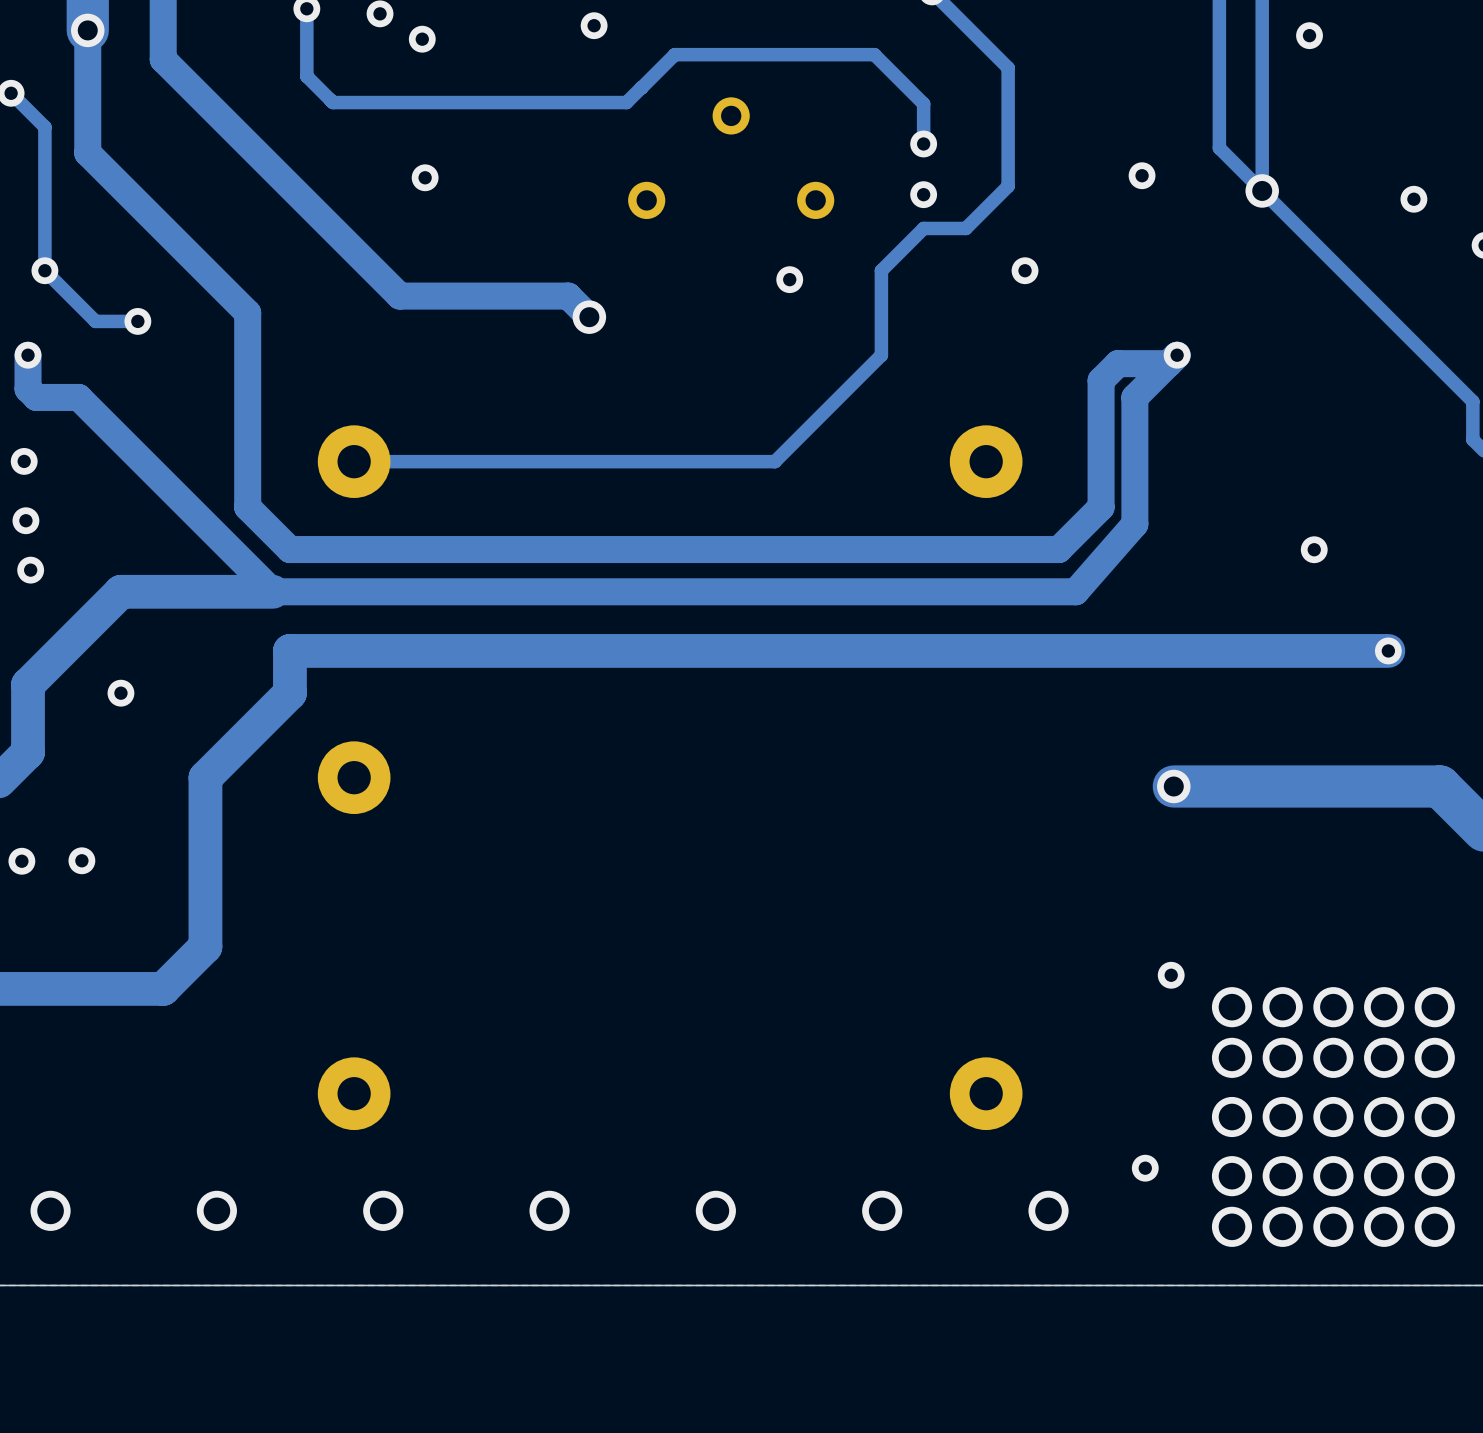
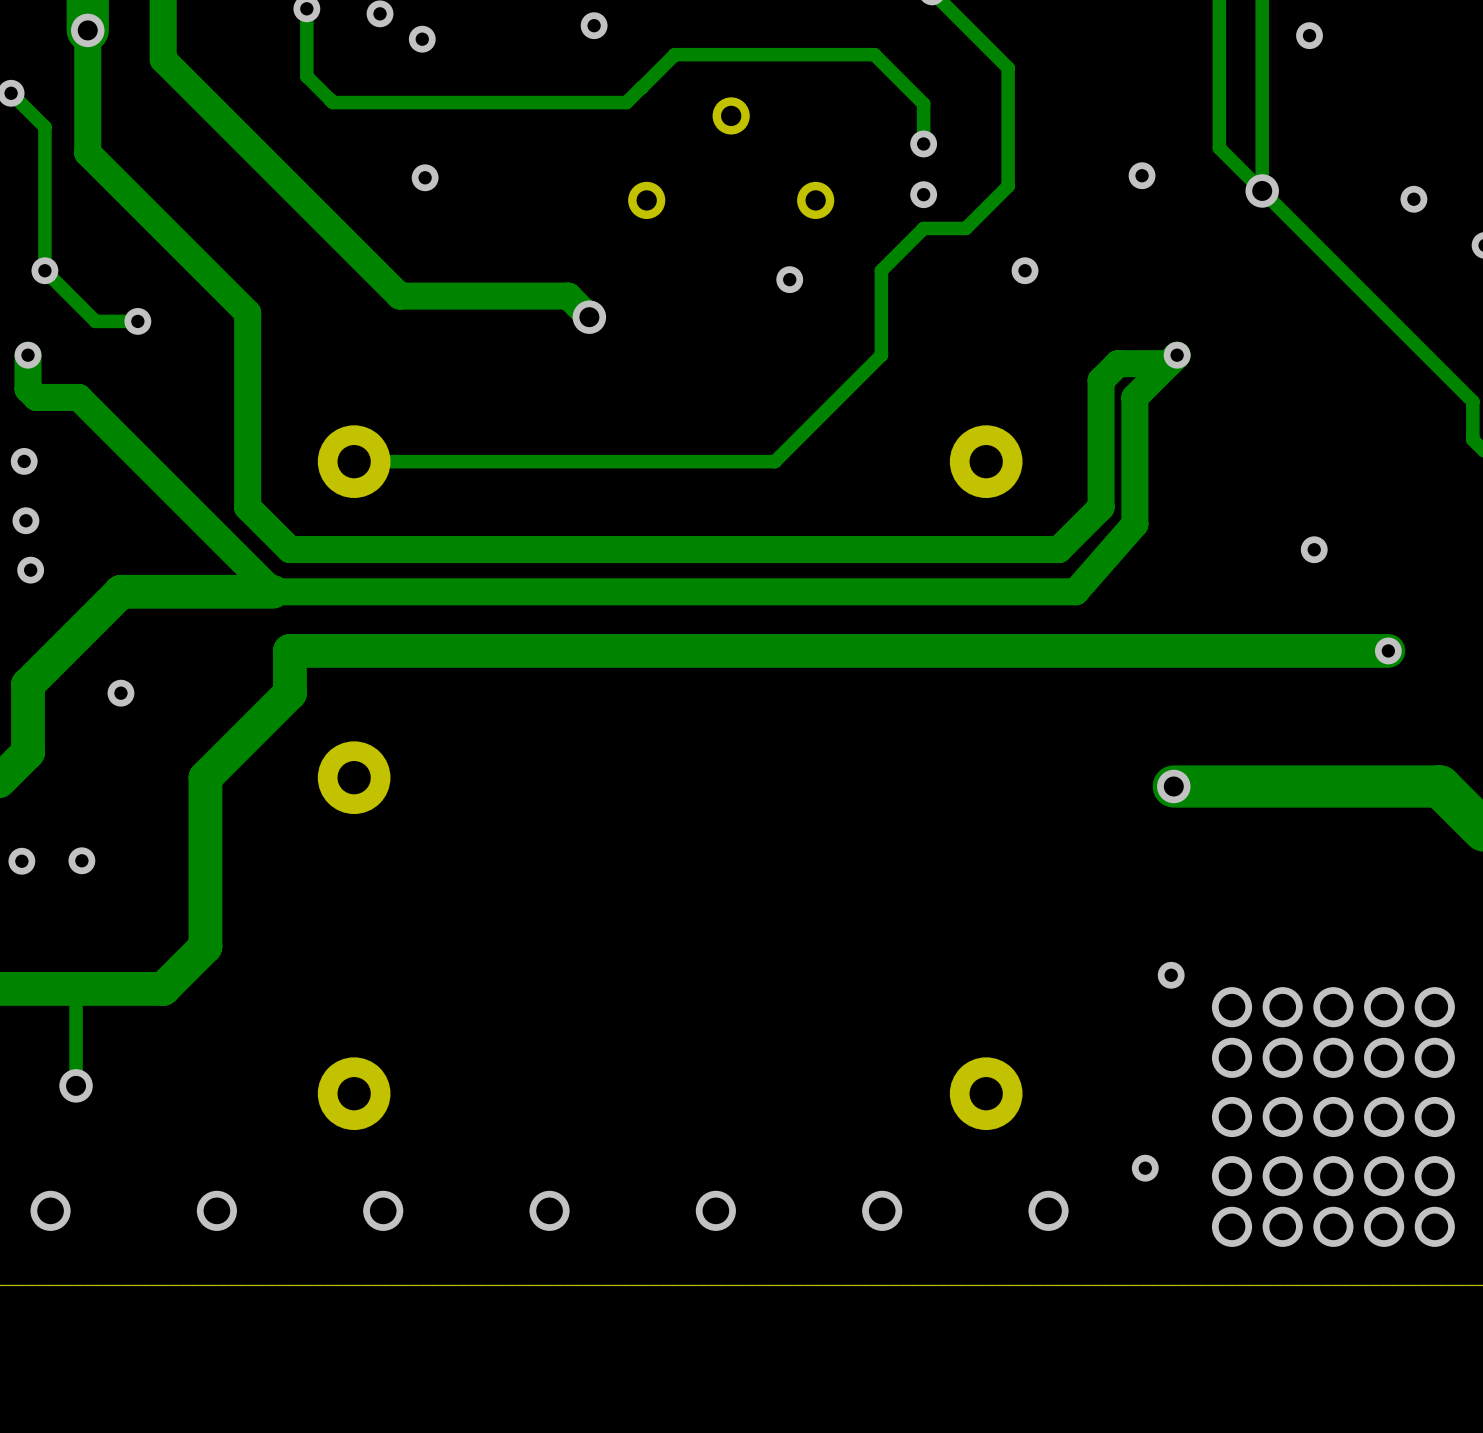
track: none -> (76, 988) (76, 1085)
via: none -> (76, 1085)

